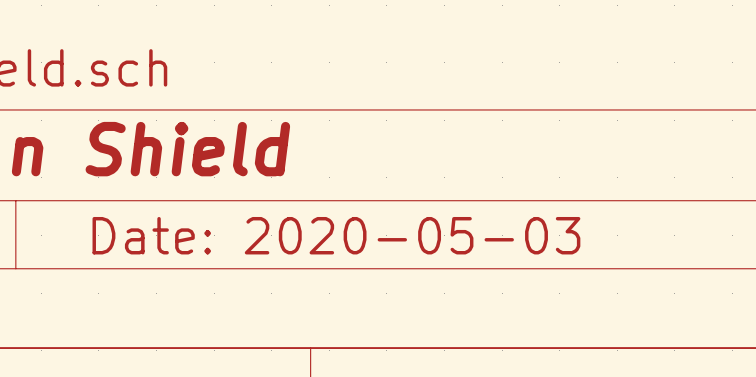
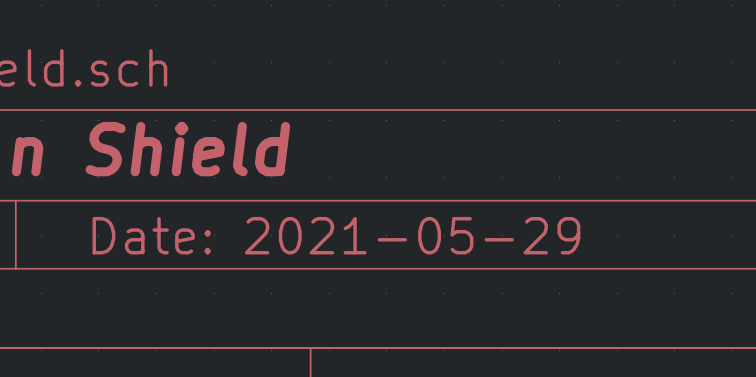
title block: Date: 2020-05-03 (336, 235) -> Date: 2021-05-29 (336, 235)

